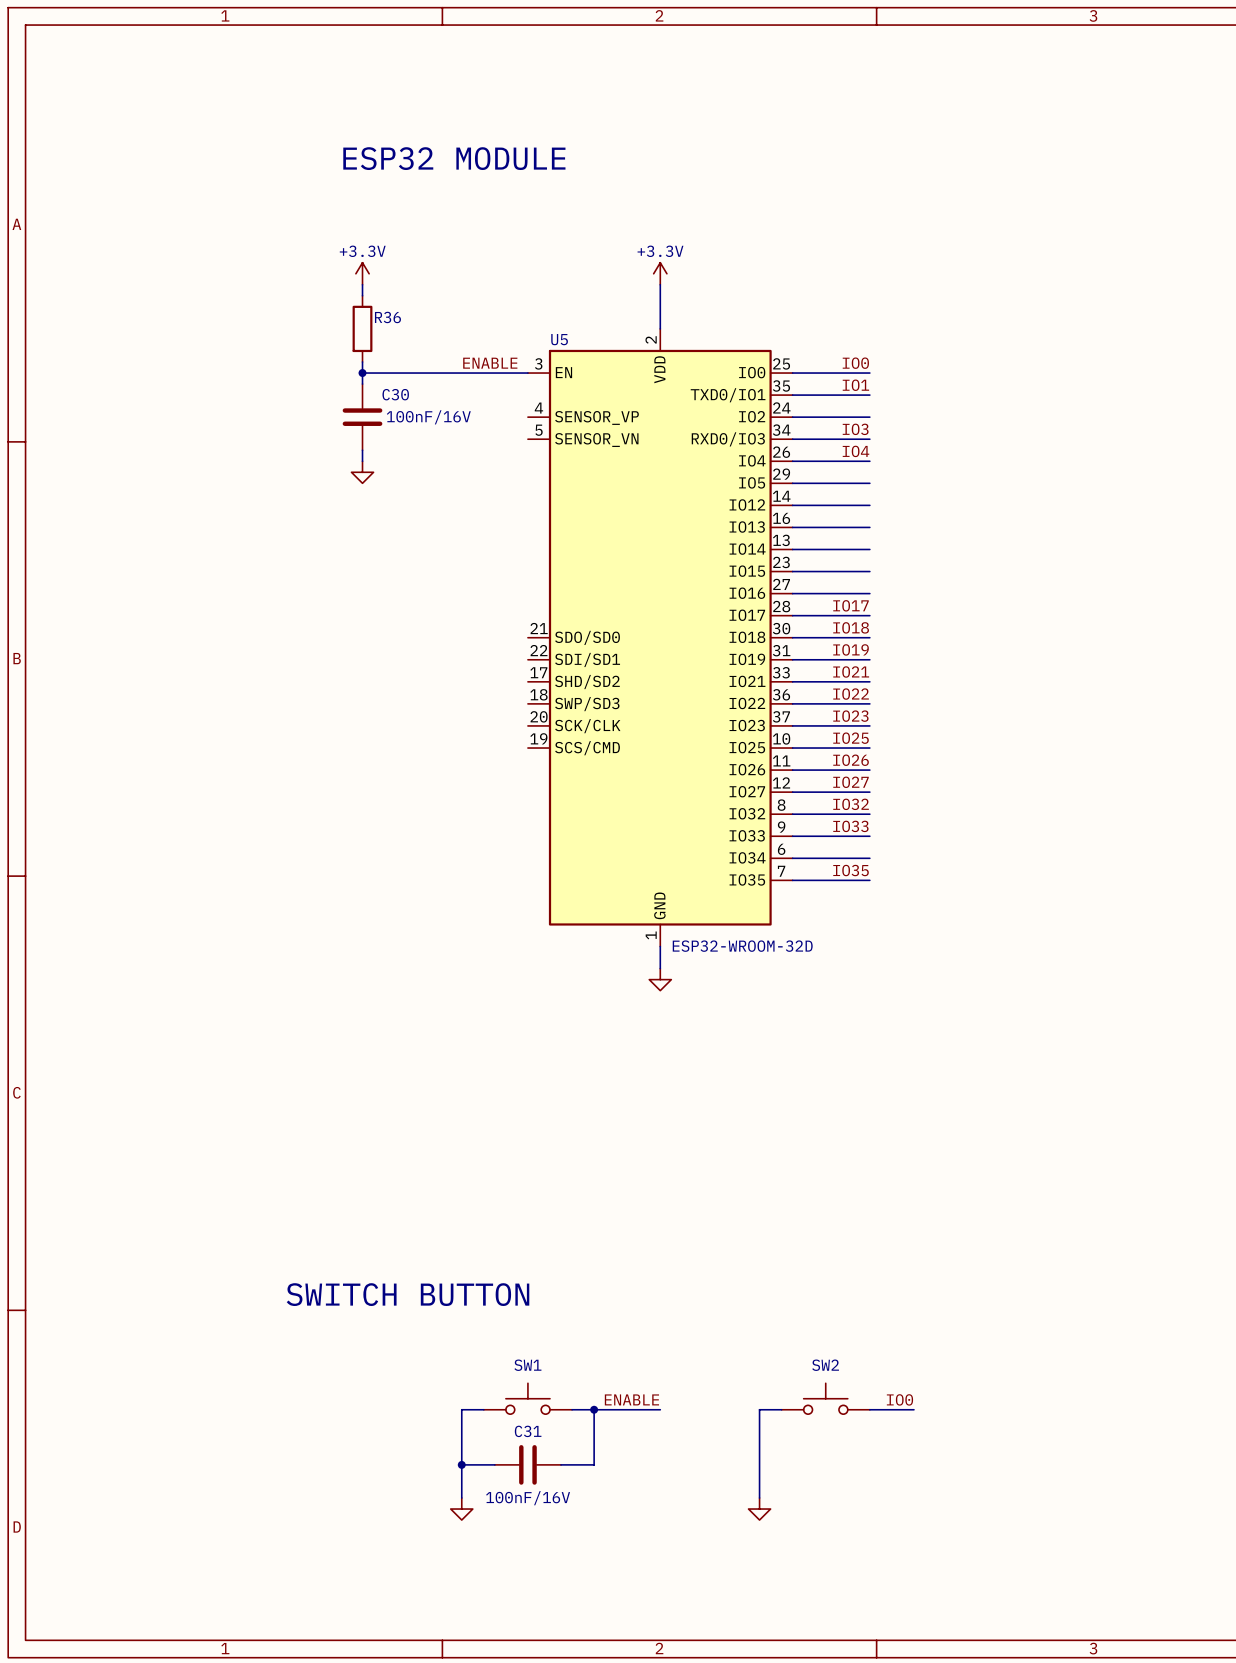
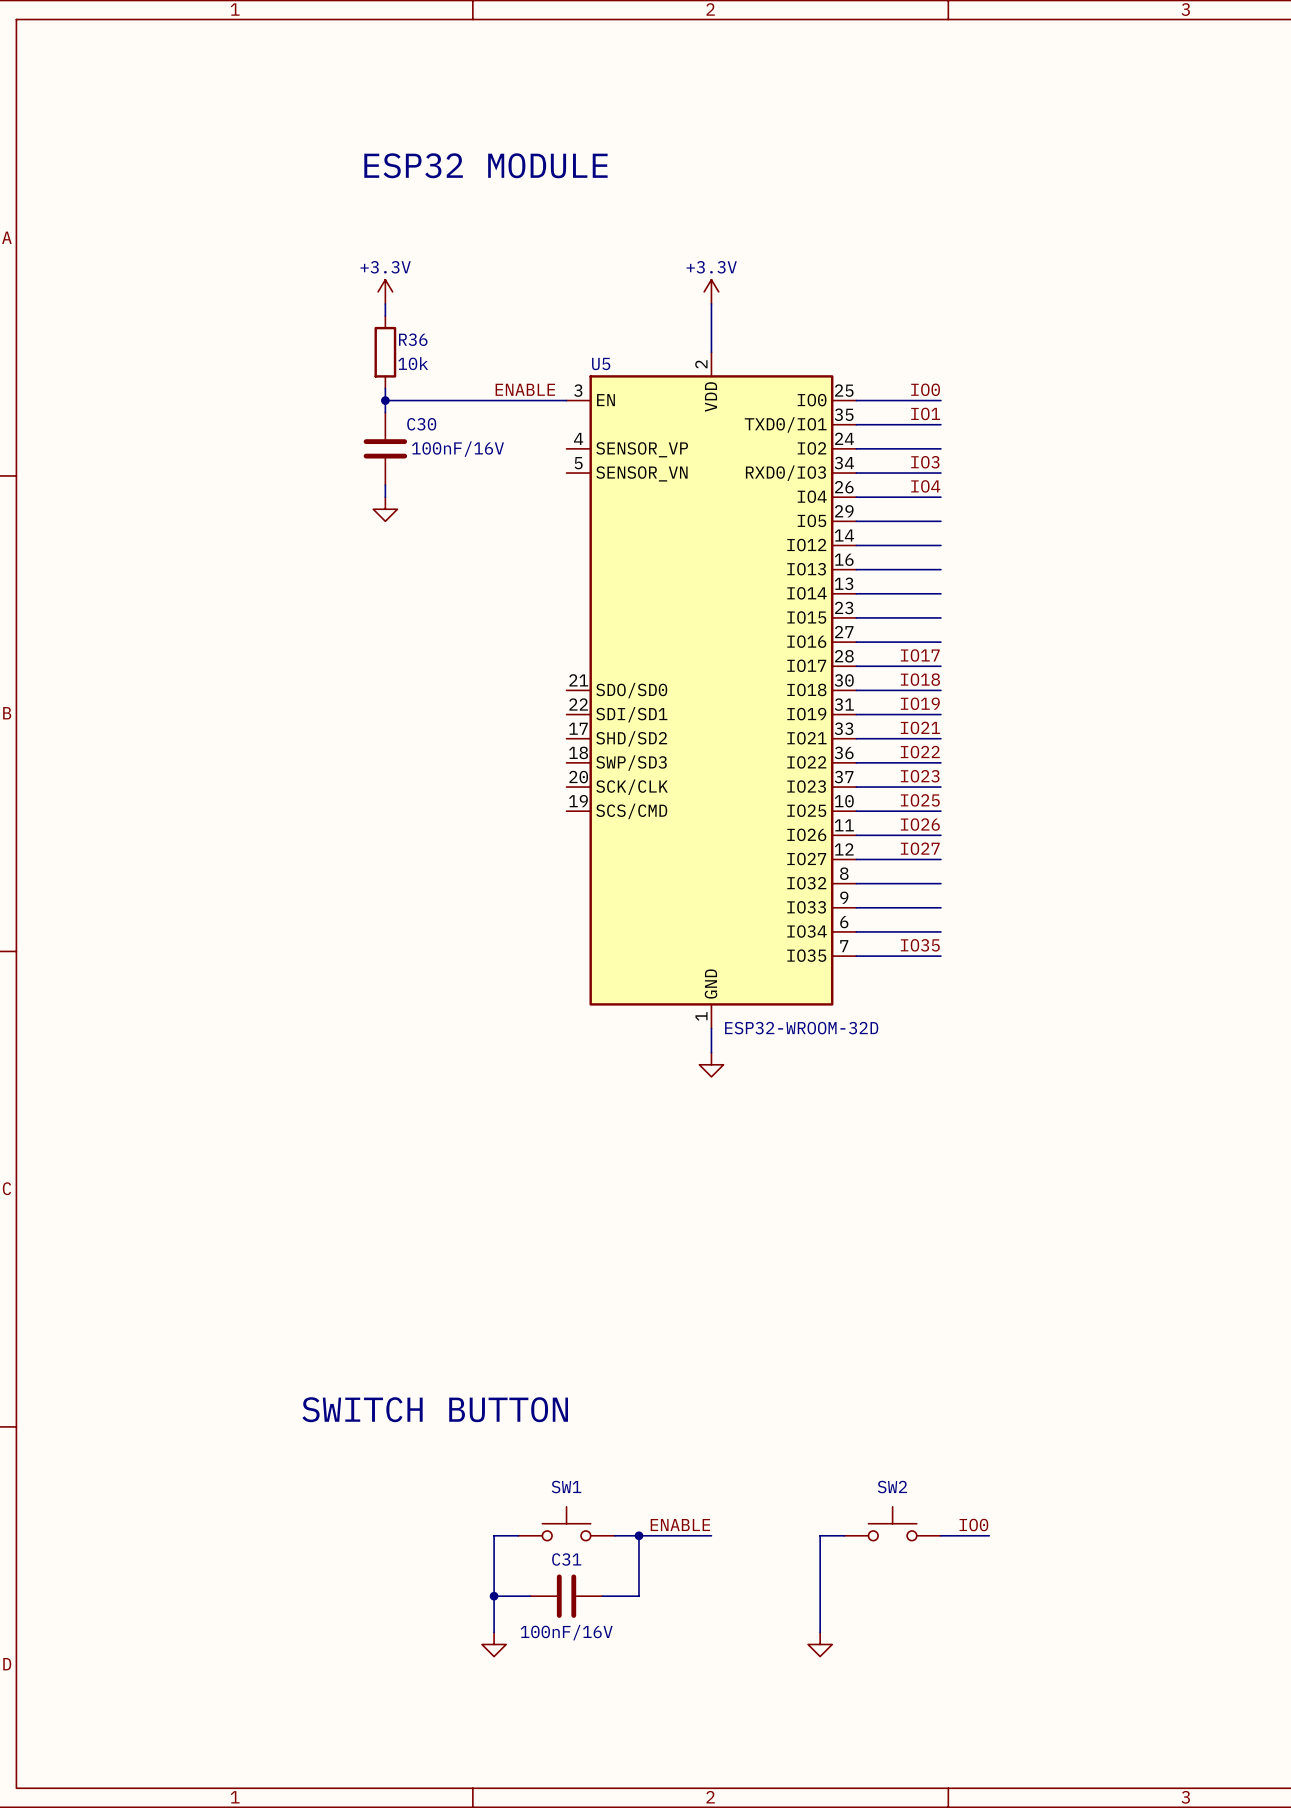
R36 value: none -> 10k (413, 363)
label: IO32 (851, 804) -> none
label: IO33 (850, 826) -> none

